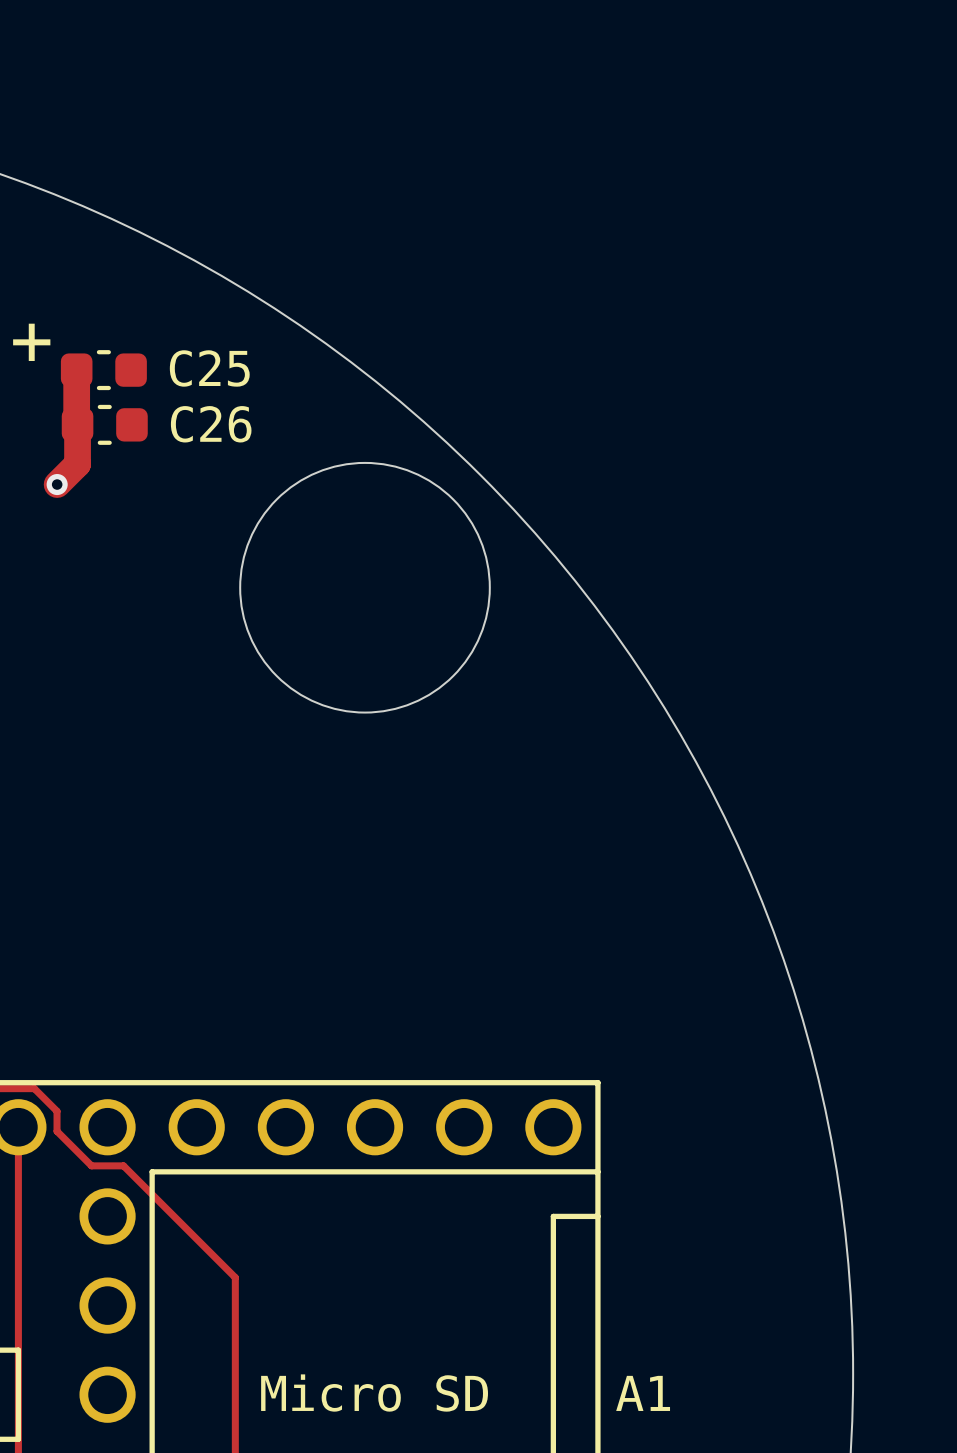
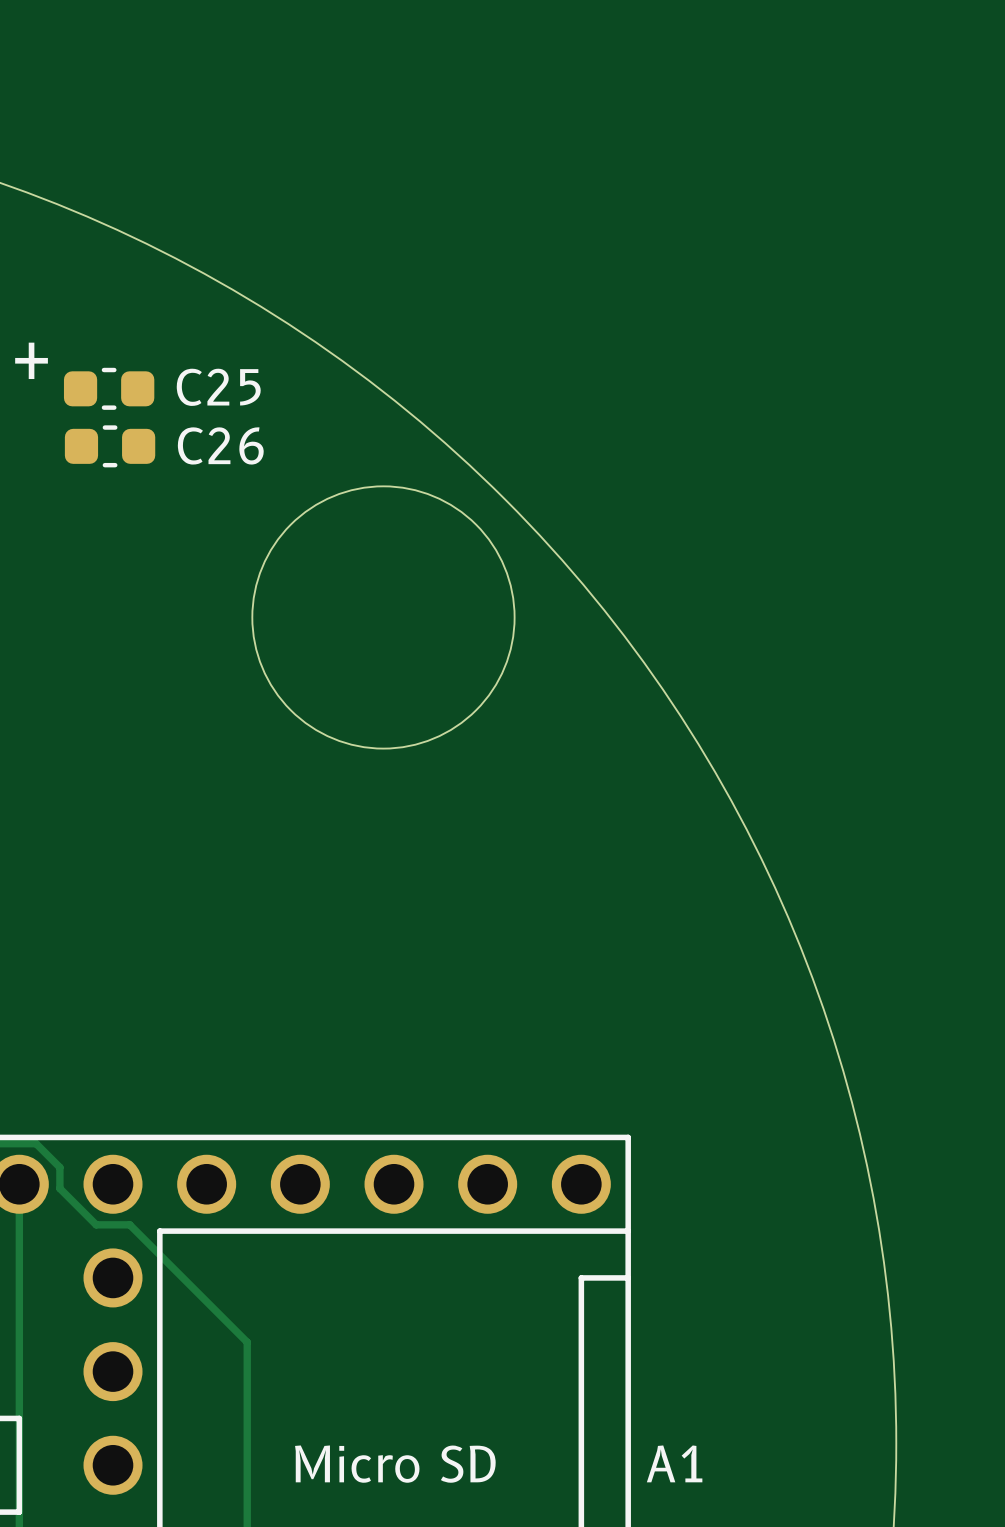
track: (76, 370) (77, 464) (57, 484) -> none
via: (57, 484) -> none

